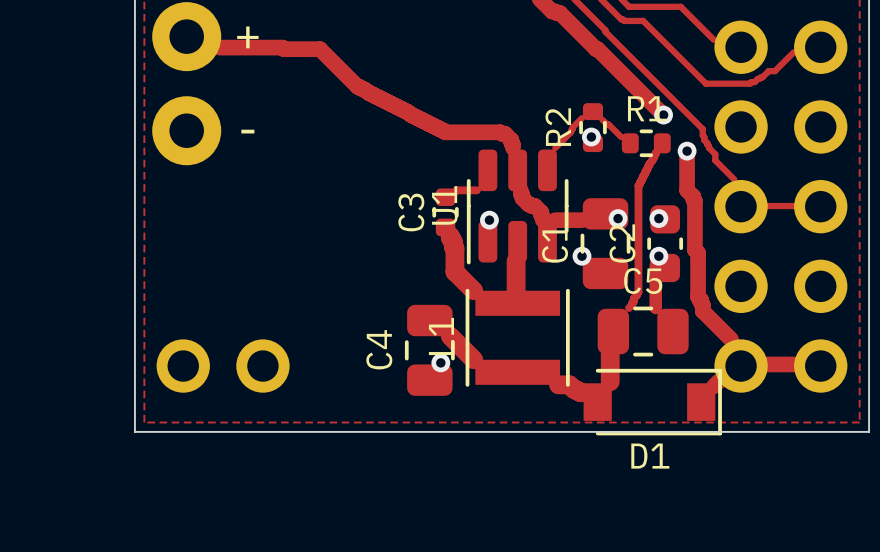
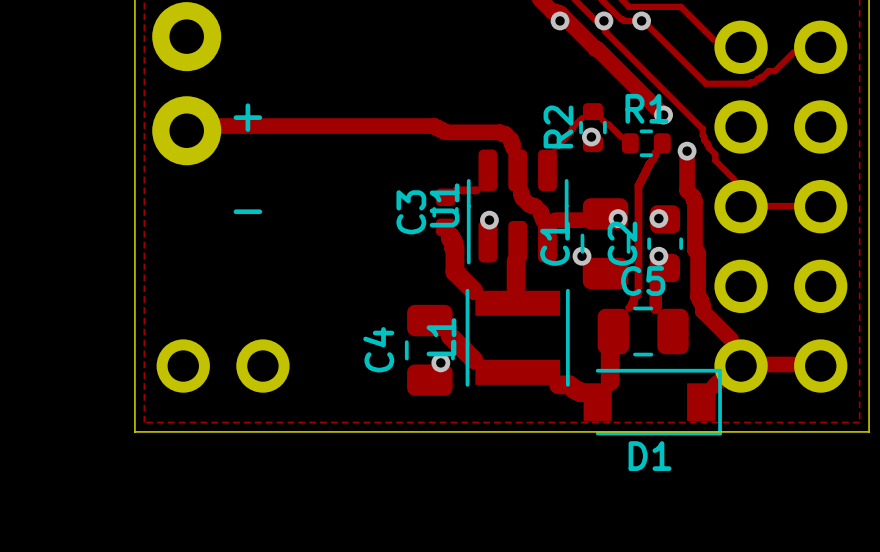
via: none -> (560, 20)
via: none -> (603, 20)
via: none -> (641, 20)
text position: + (247, 37) -> + (247, 117)
track: (219, 47) (320, 49) (357, 86) (432, 126) -> (219, 126) (432, 126)
text position: - (247, 131) -> - (247, 211)

